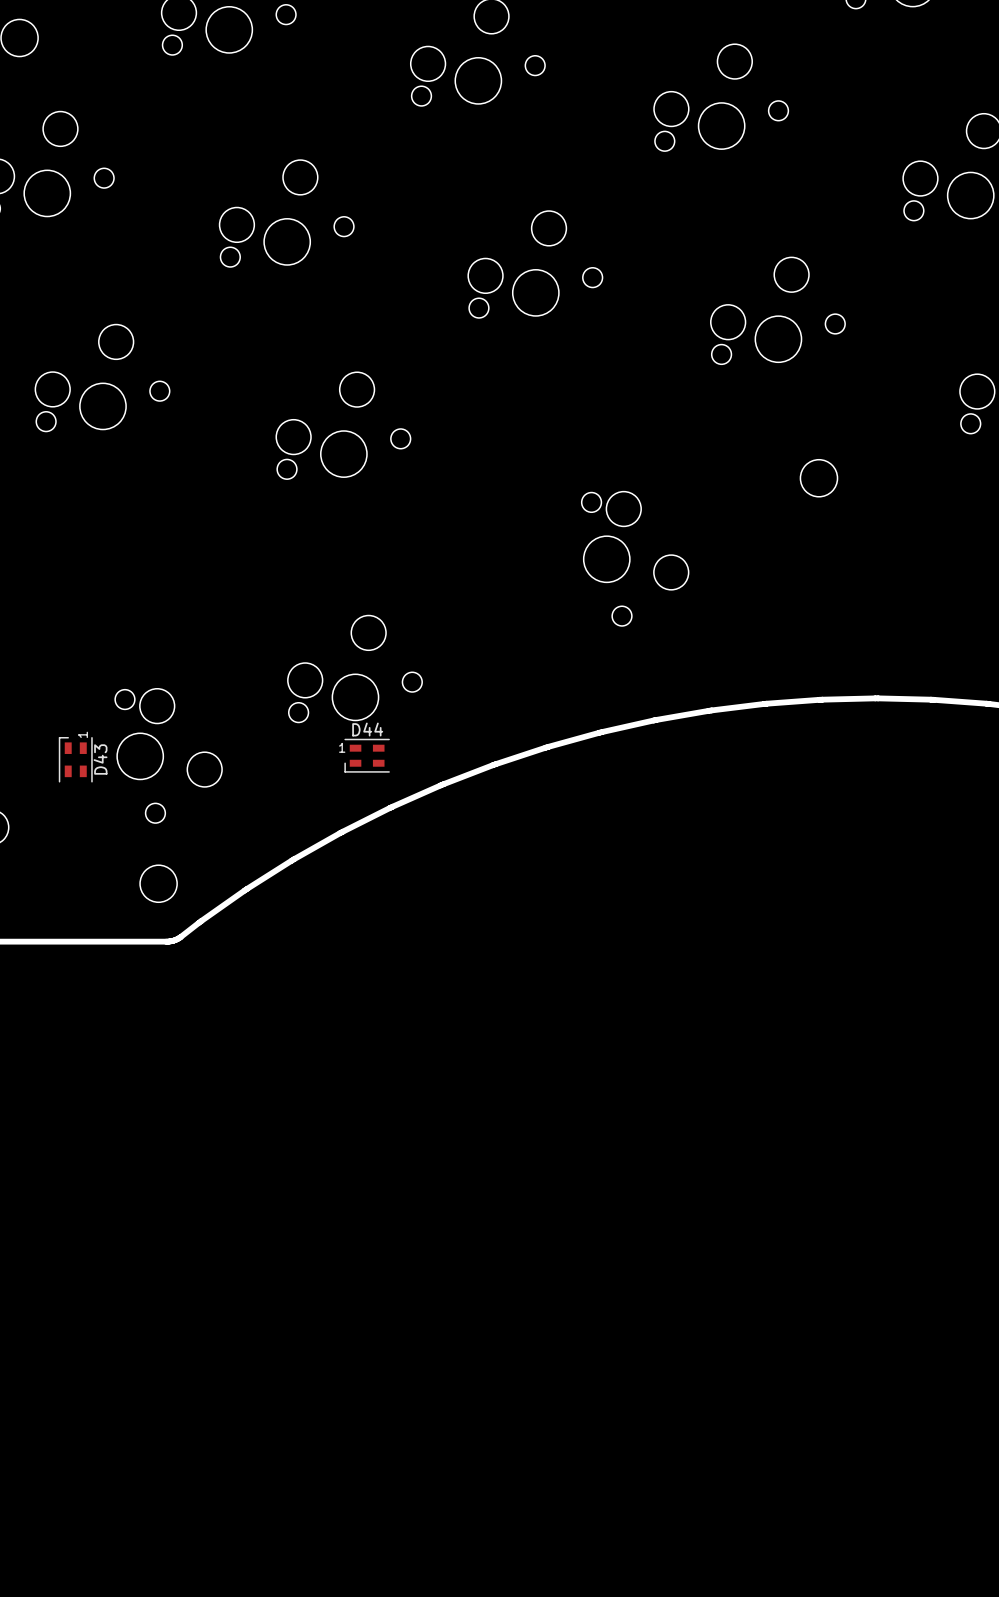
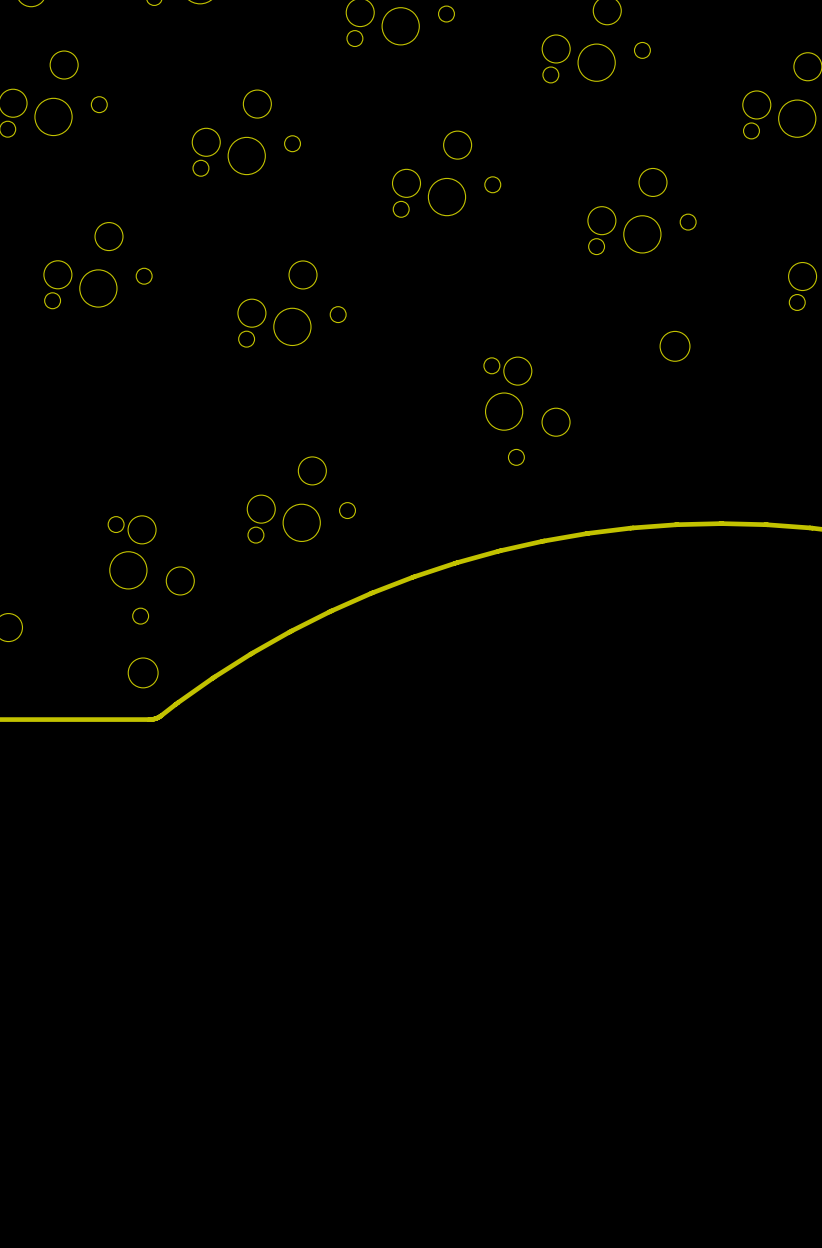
D44: (367, 755) -> none
D43: (75, 759) -> none

